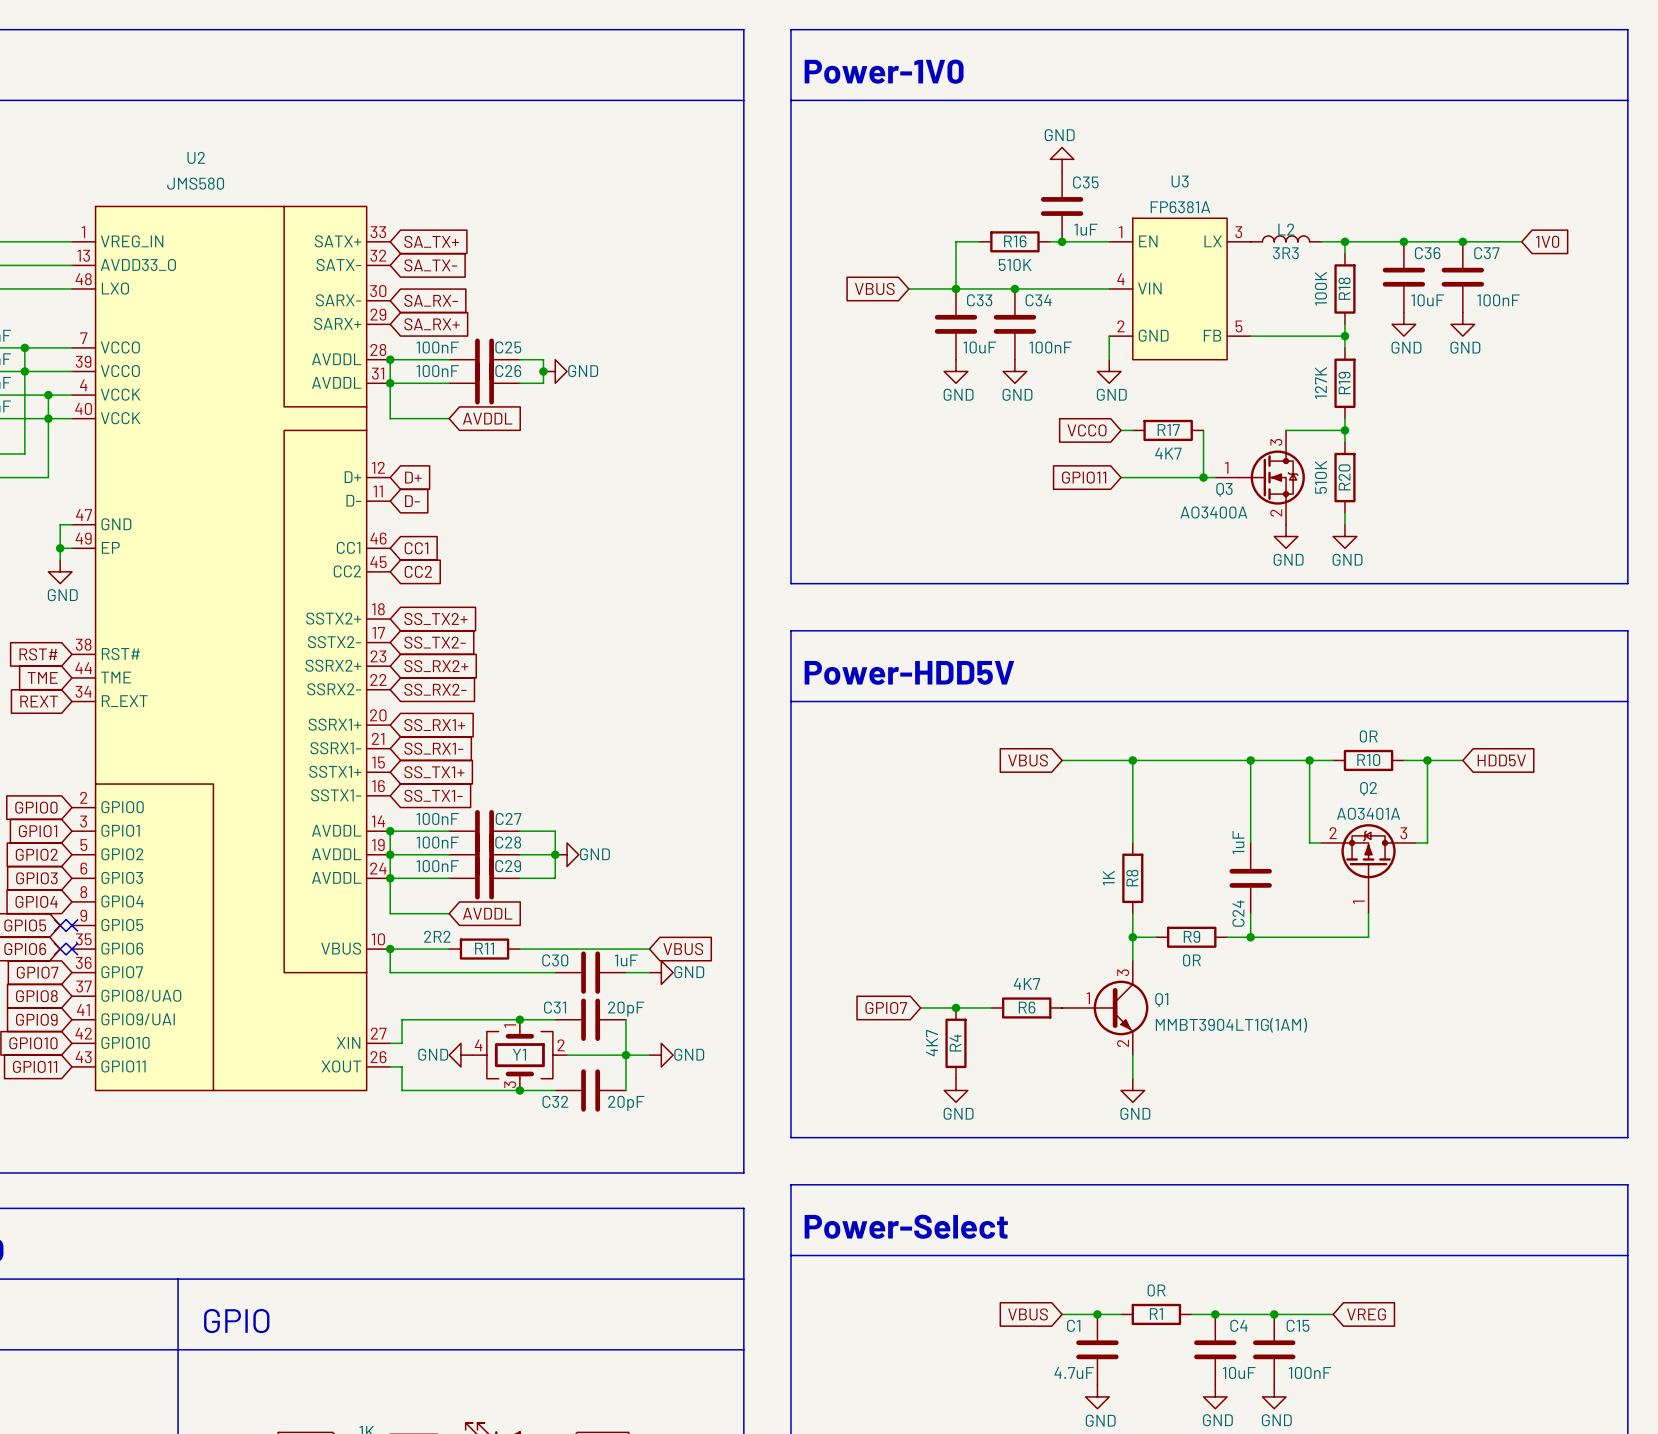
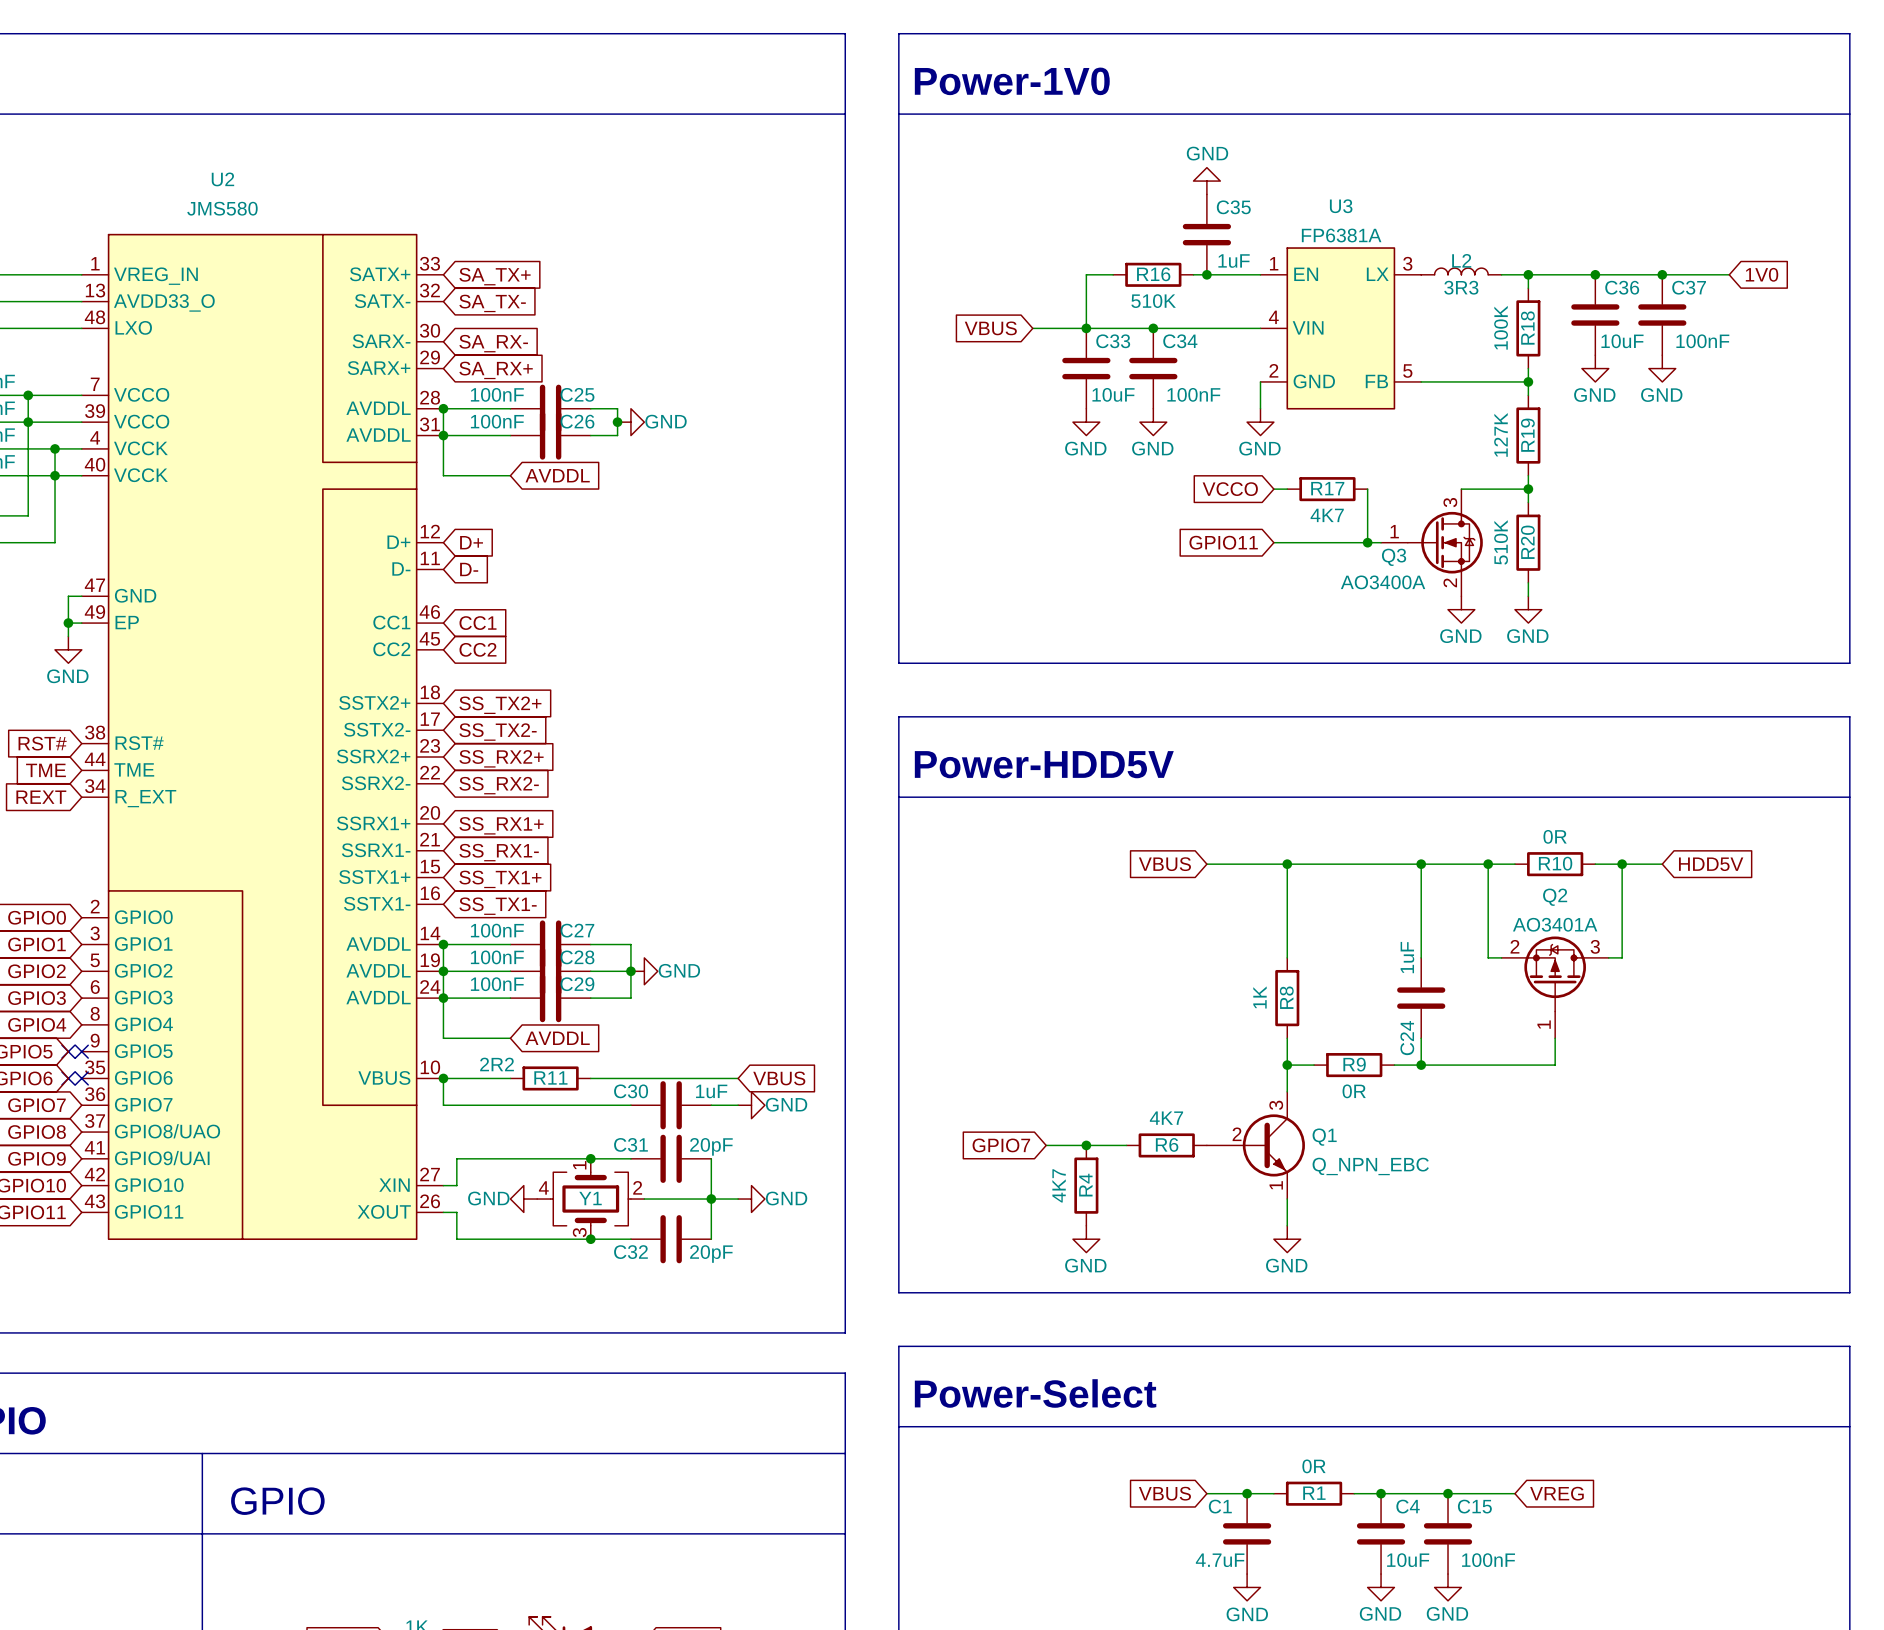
Q1 pin number: 1 (1088, 998) -> 2 (1237, 1134)
Q1 value: MMBT3904LT1G(1AM) (1231, 1025) -> Q_NPN_EBC (1370, 1166)
Q1 pin number: 2 (1123, 1043) -> 1 (1276, 1185)

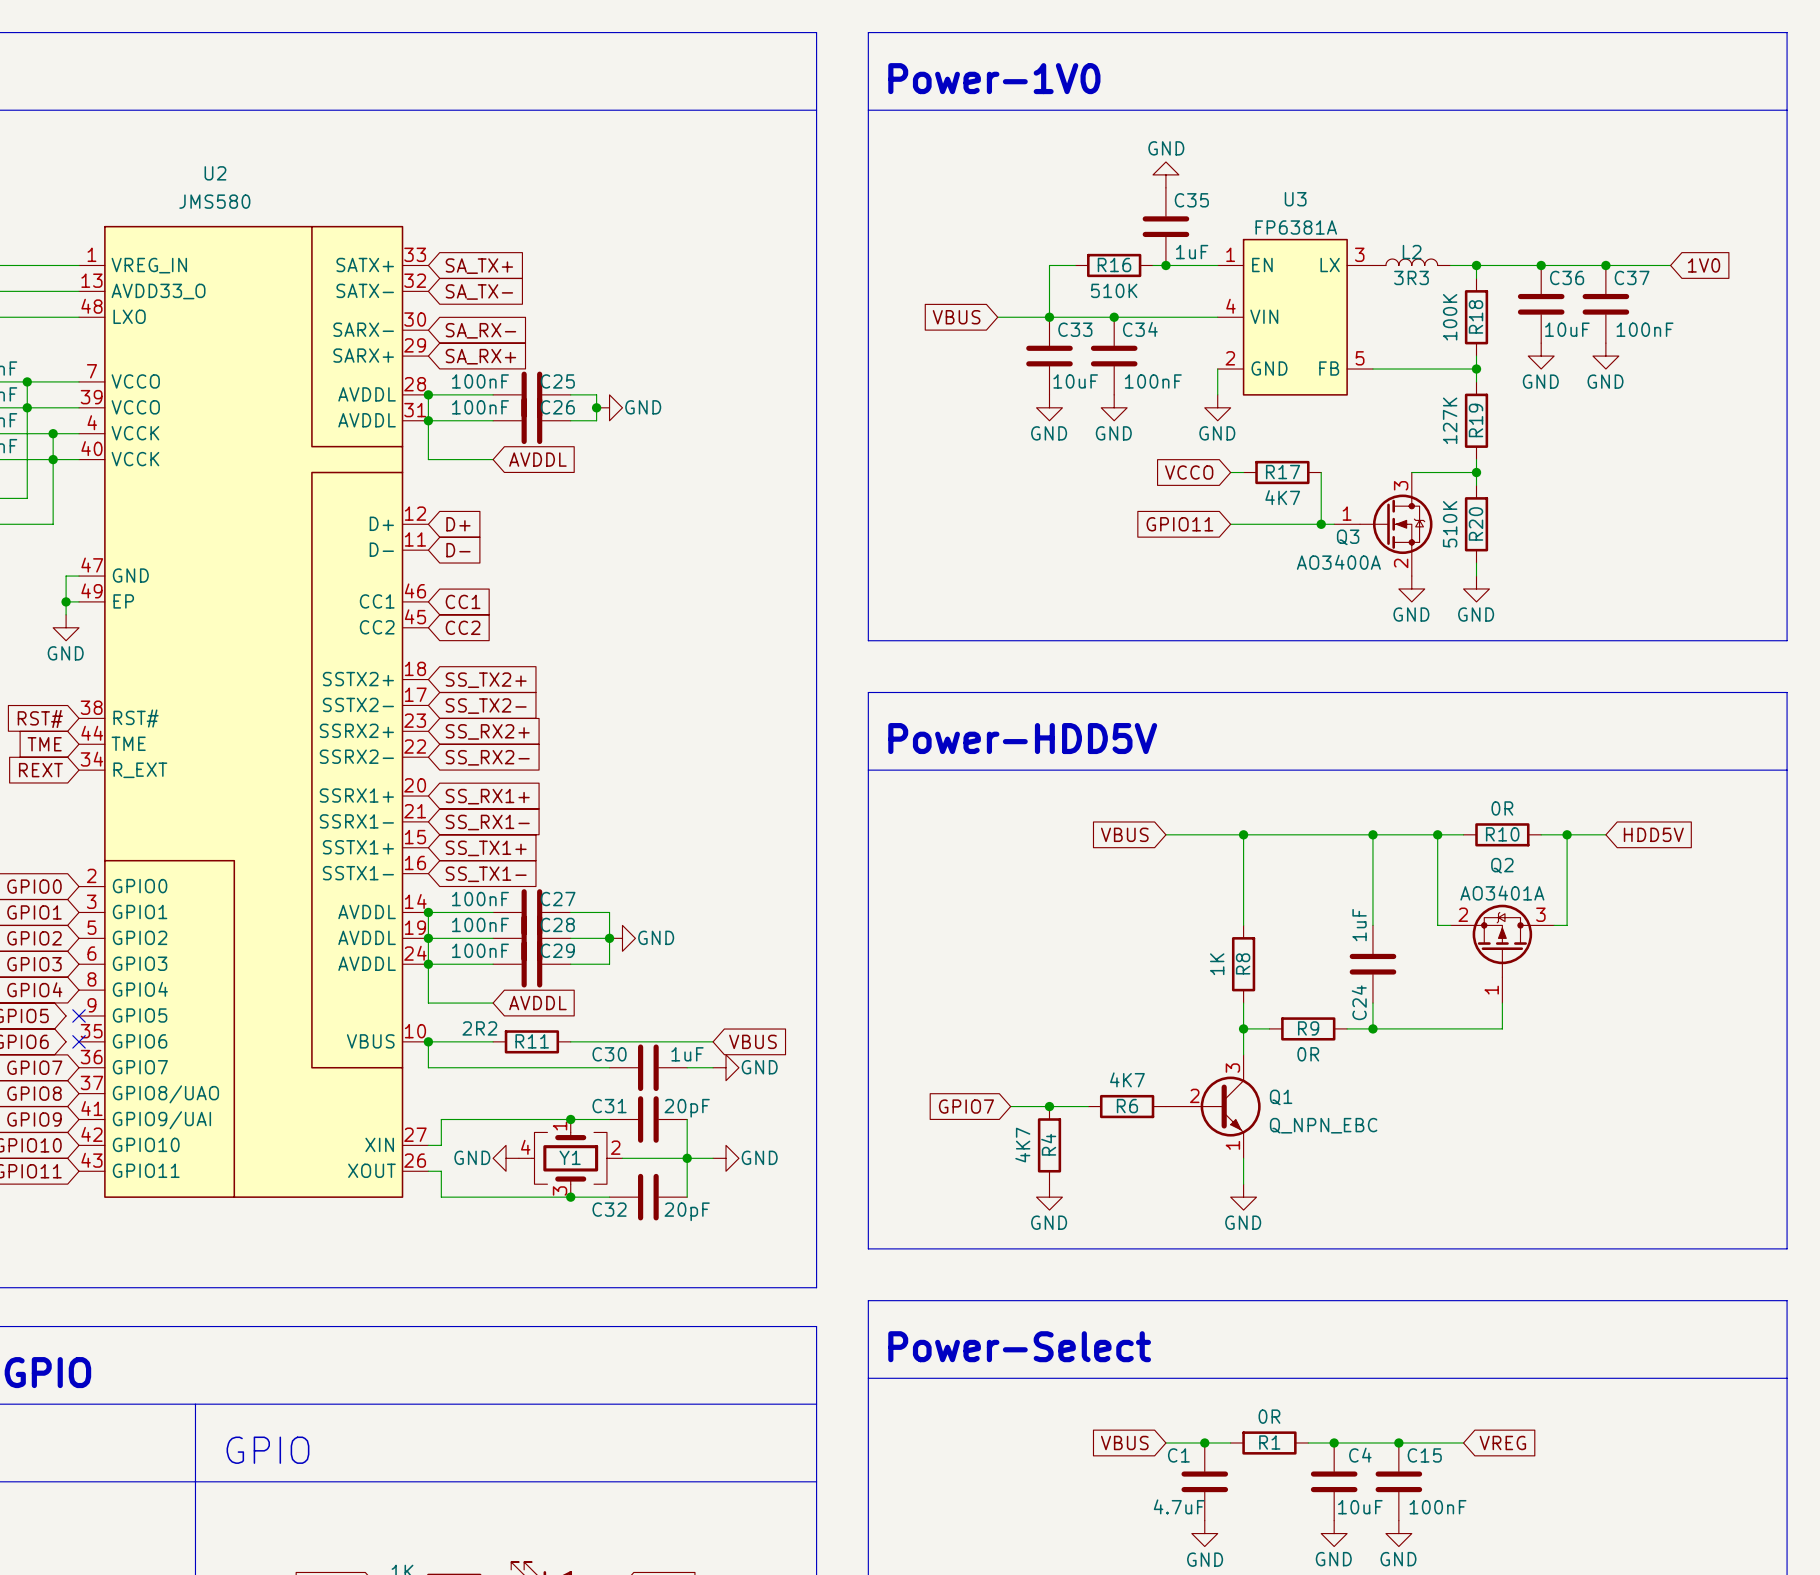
no-connect mark: (68, 1051) -> none
no-connect mark: (68, 1078) -> none

